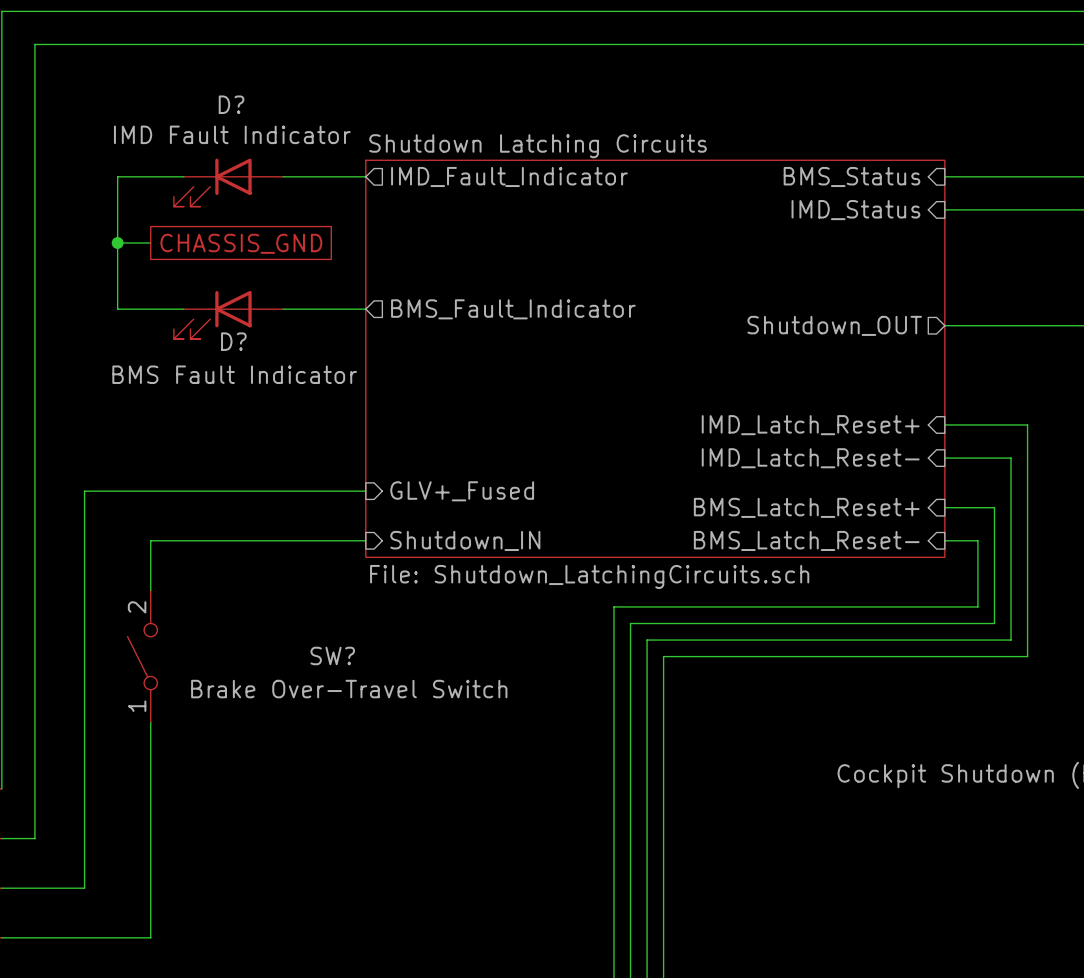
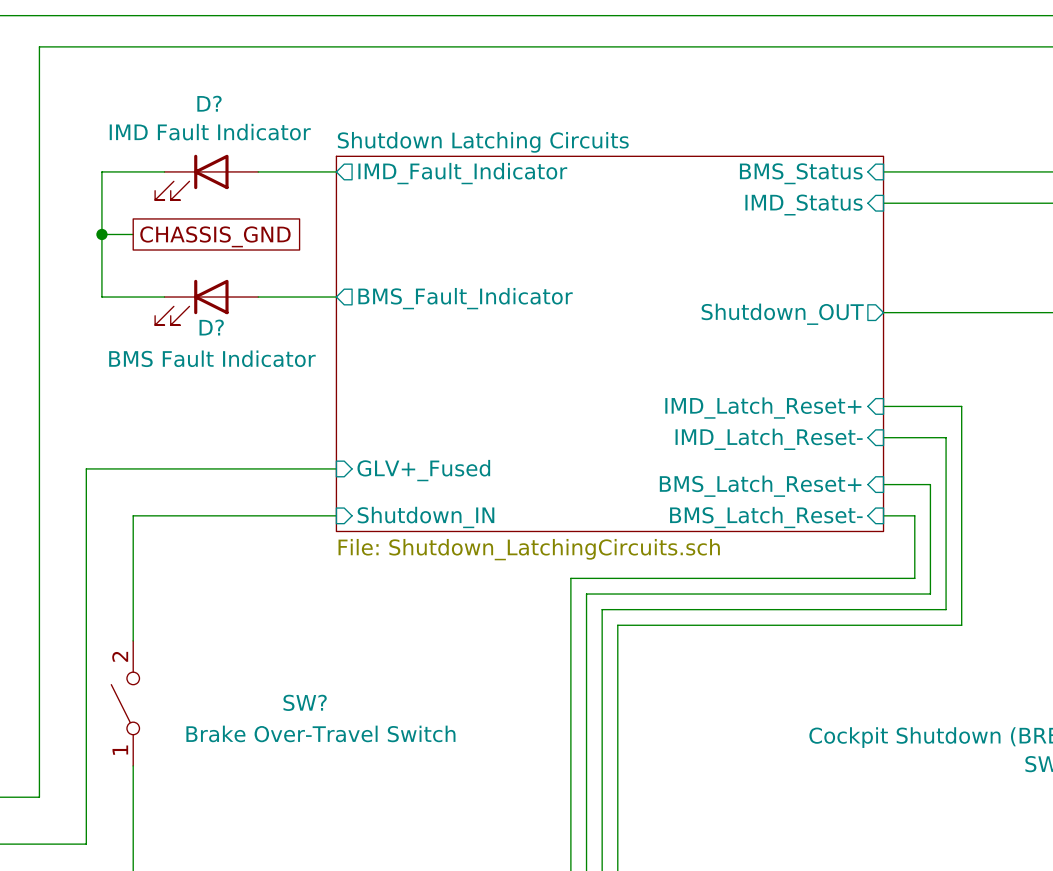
wire: (51, 44) (34, 44) (34, 838) -> (39, 46) (39, 797) (23, 797)
wire: (101, 491) (84, 491) (84, 888) -> (86, 468) (86, 844) (70, 844)
SW? position: (142, 656) -> (125, 703)
wire: (150, 722) (150, 805) -> (133, 562) (133, 640)

